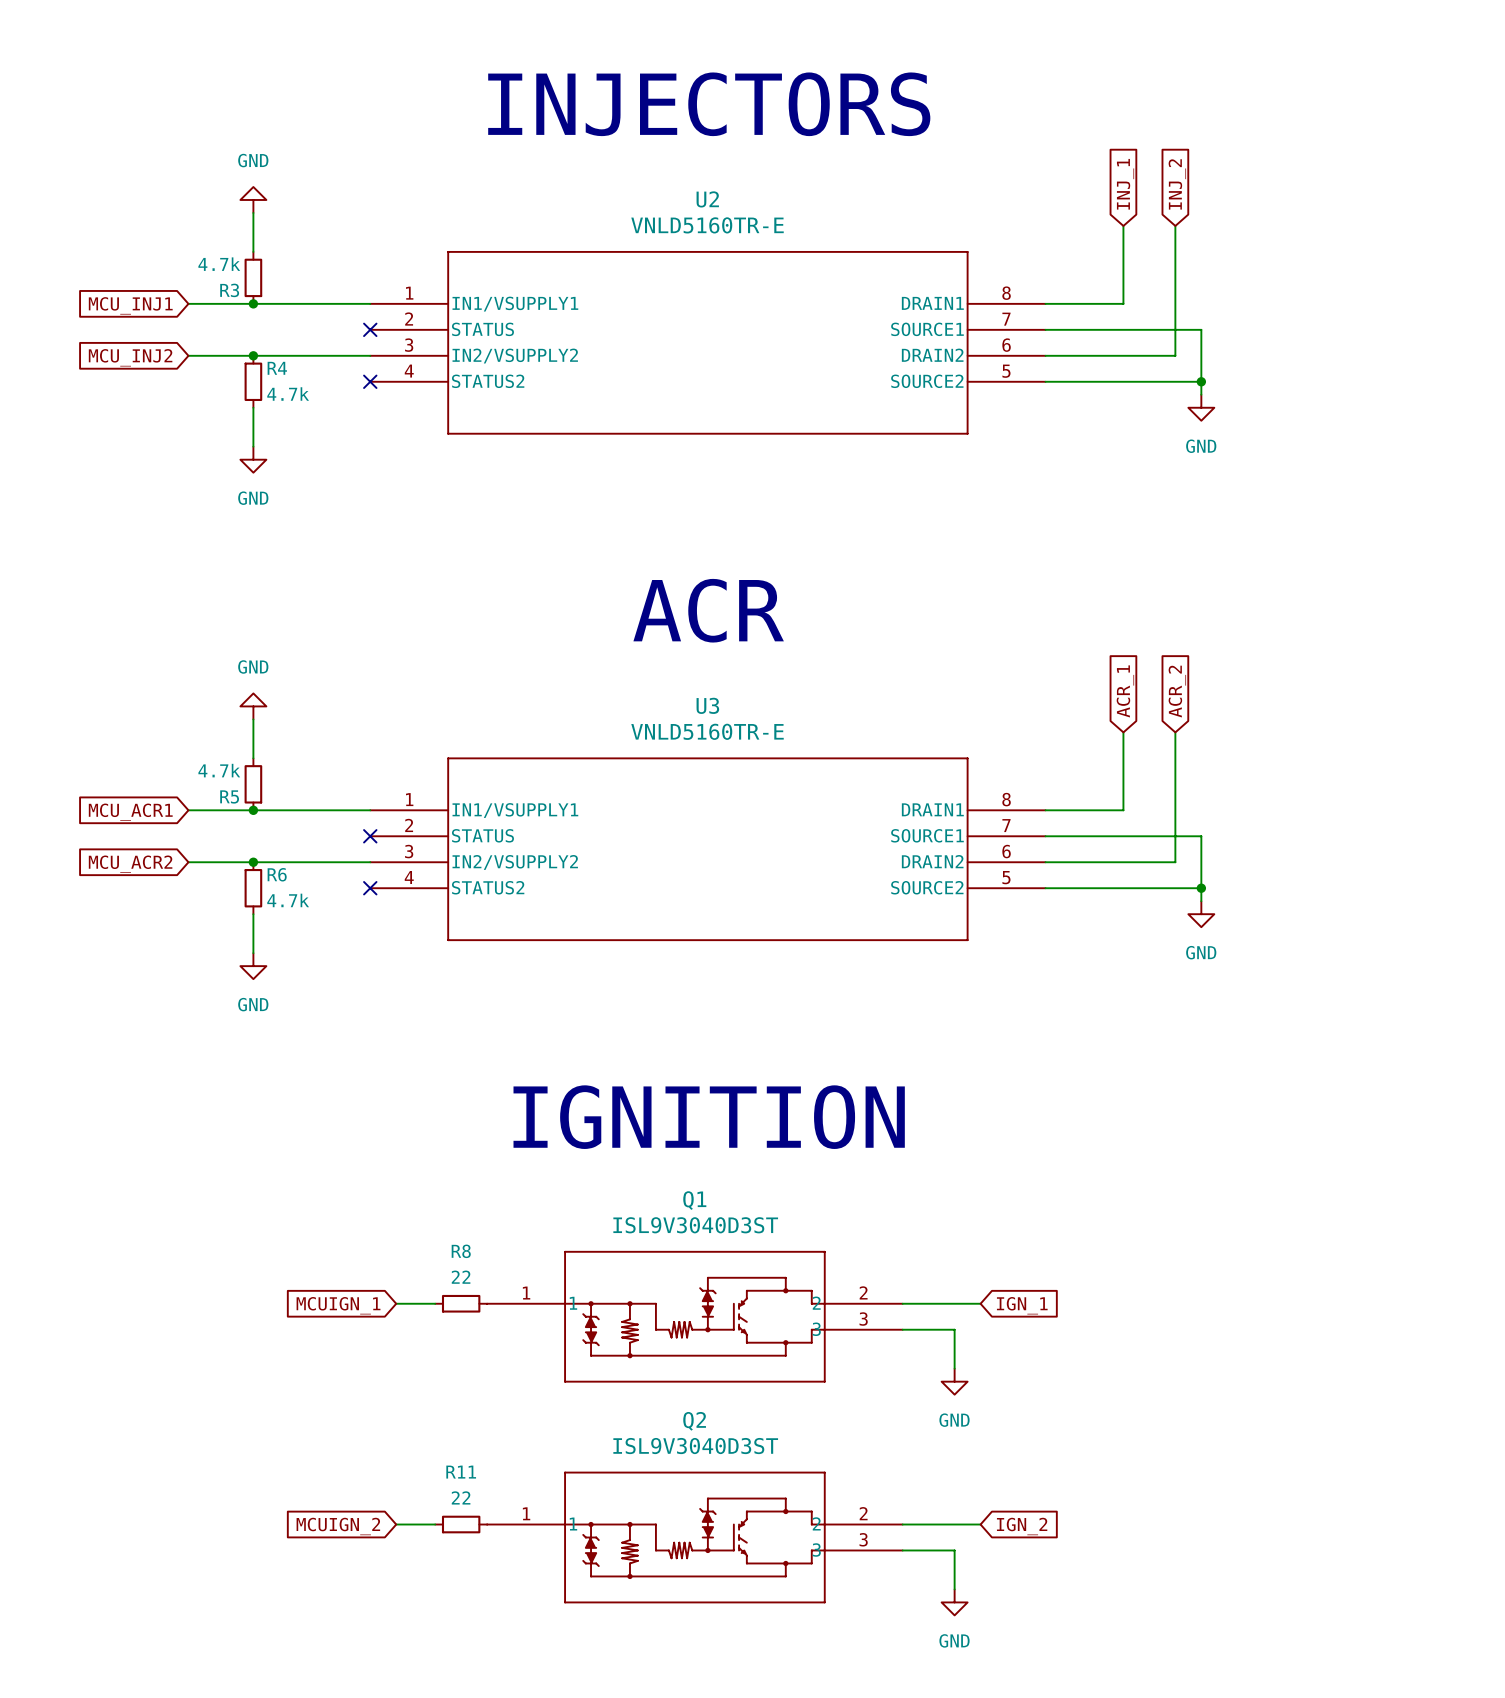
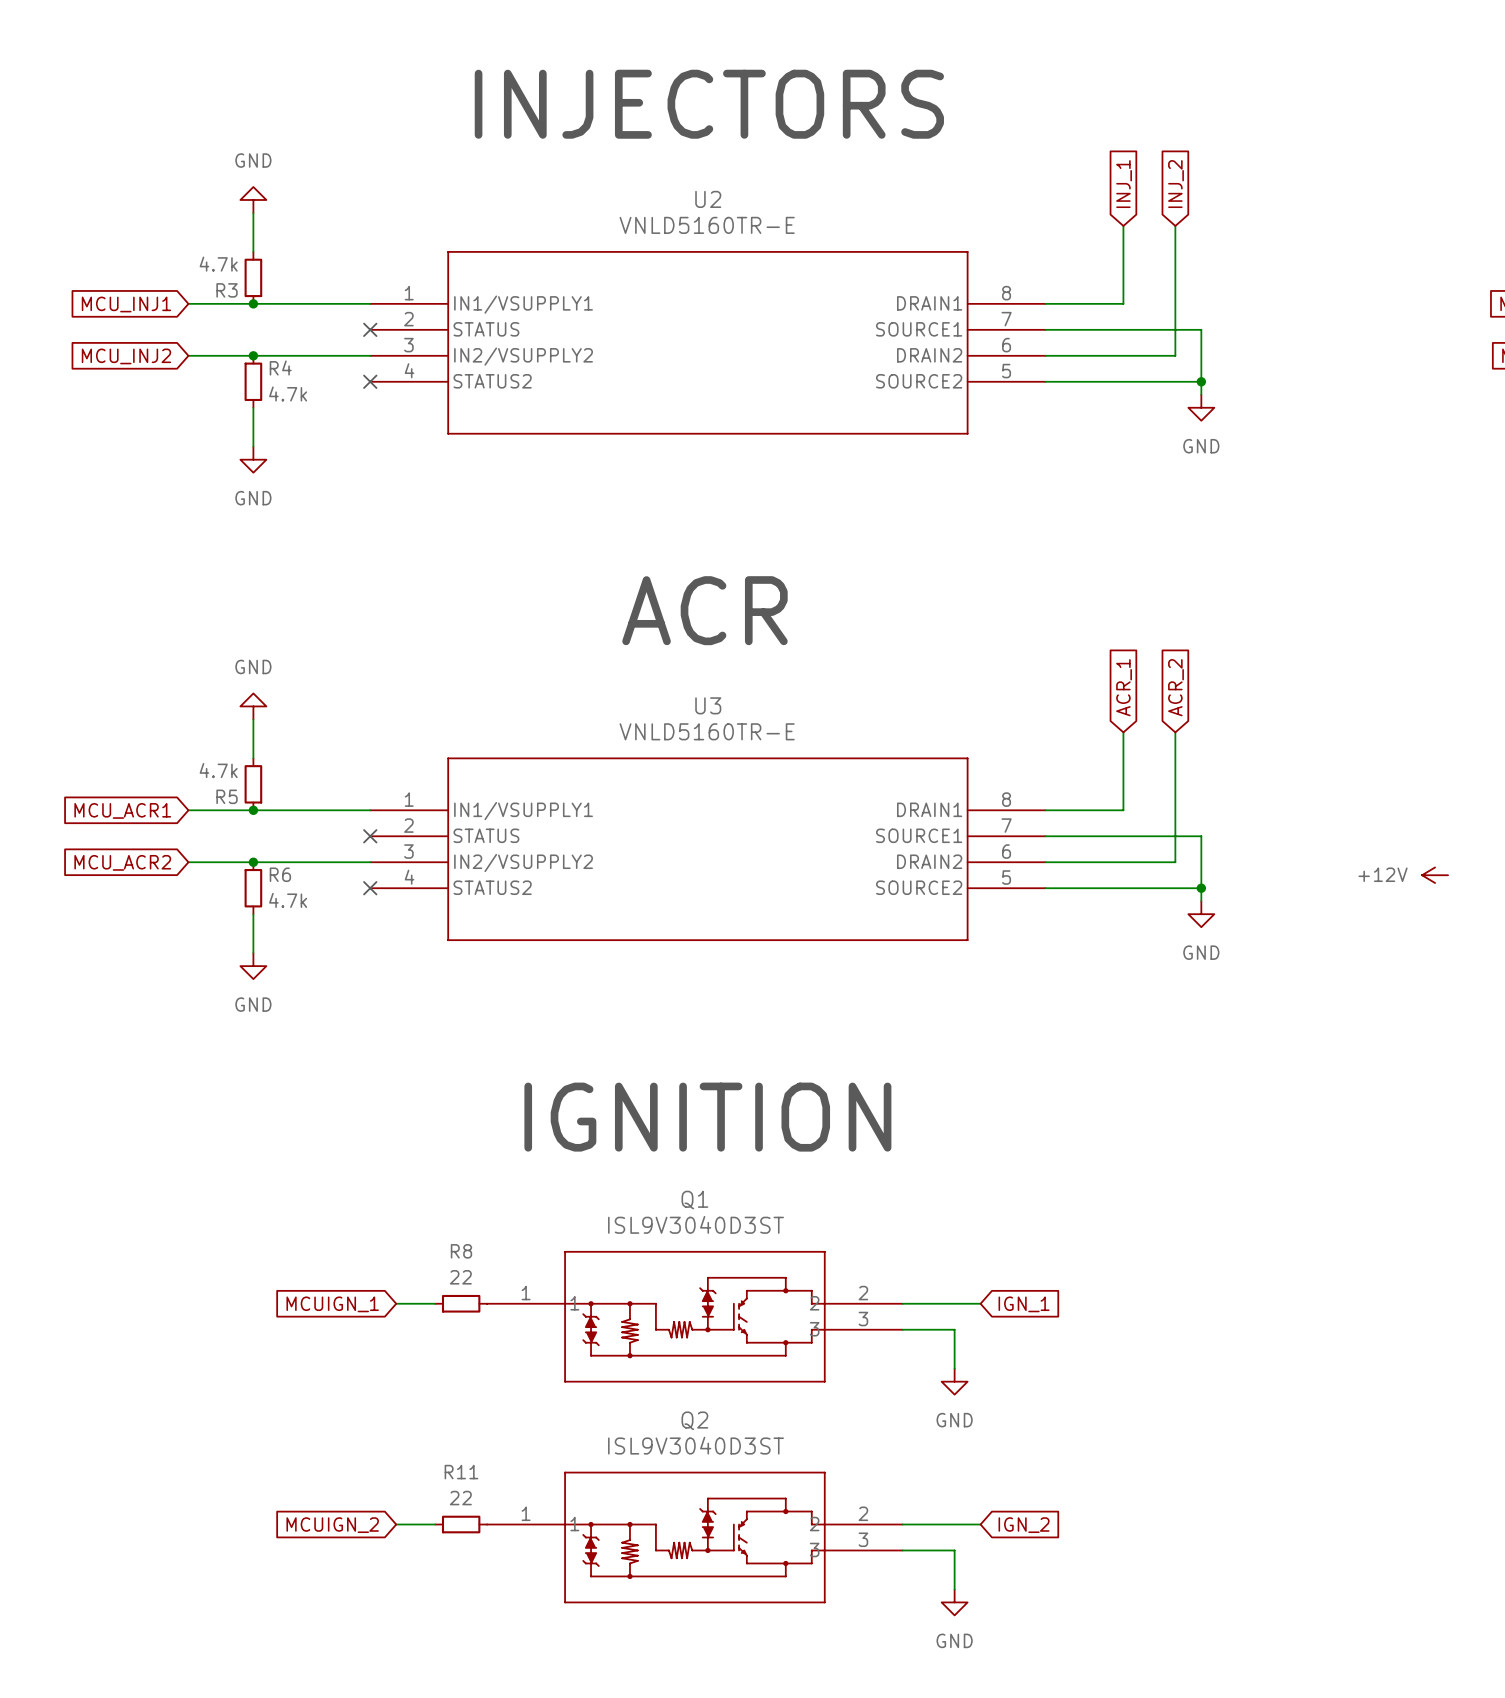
power symbol: none -> +12V (1435, 875)

